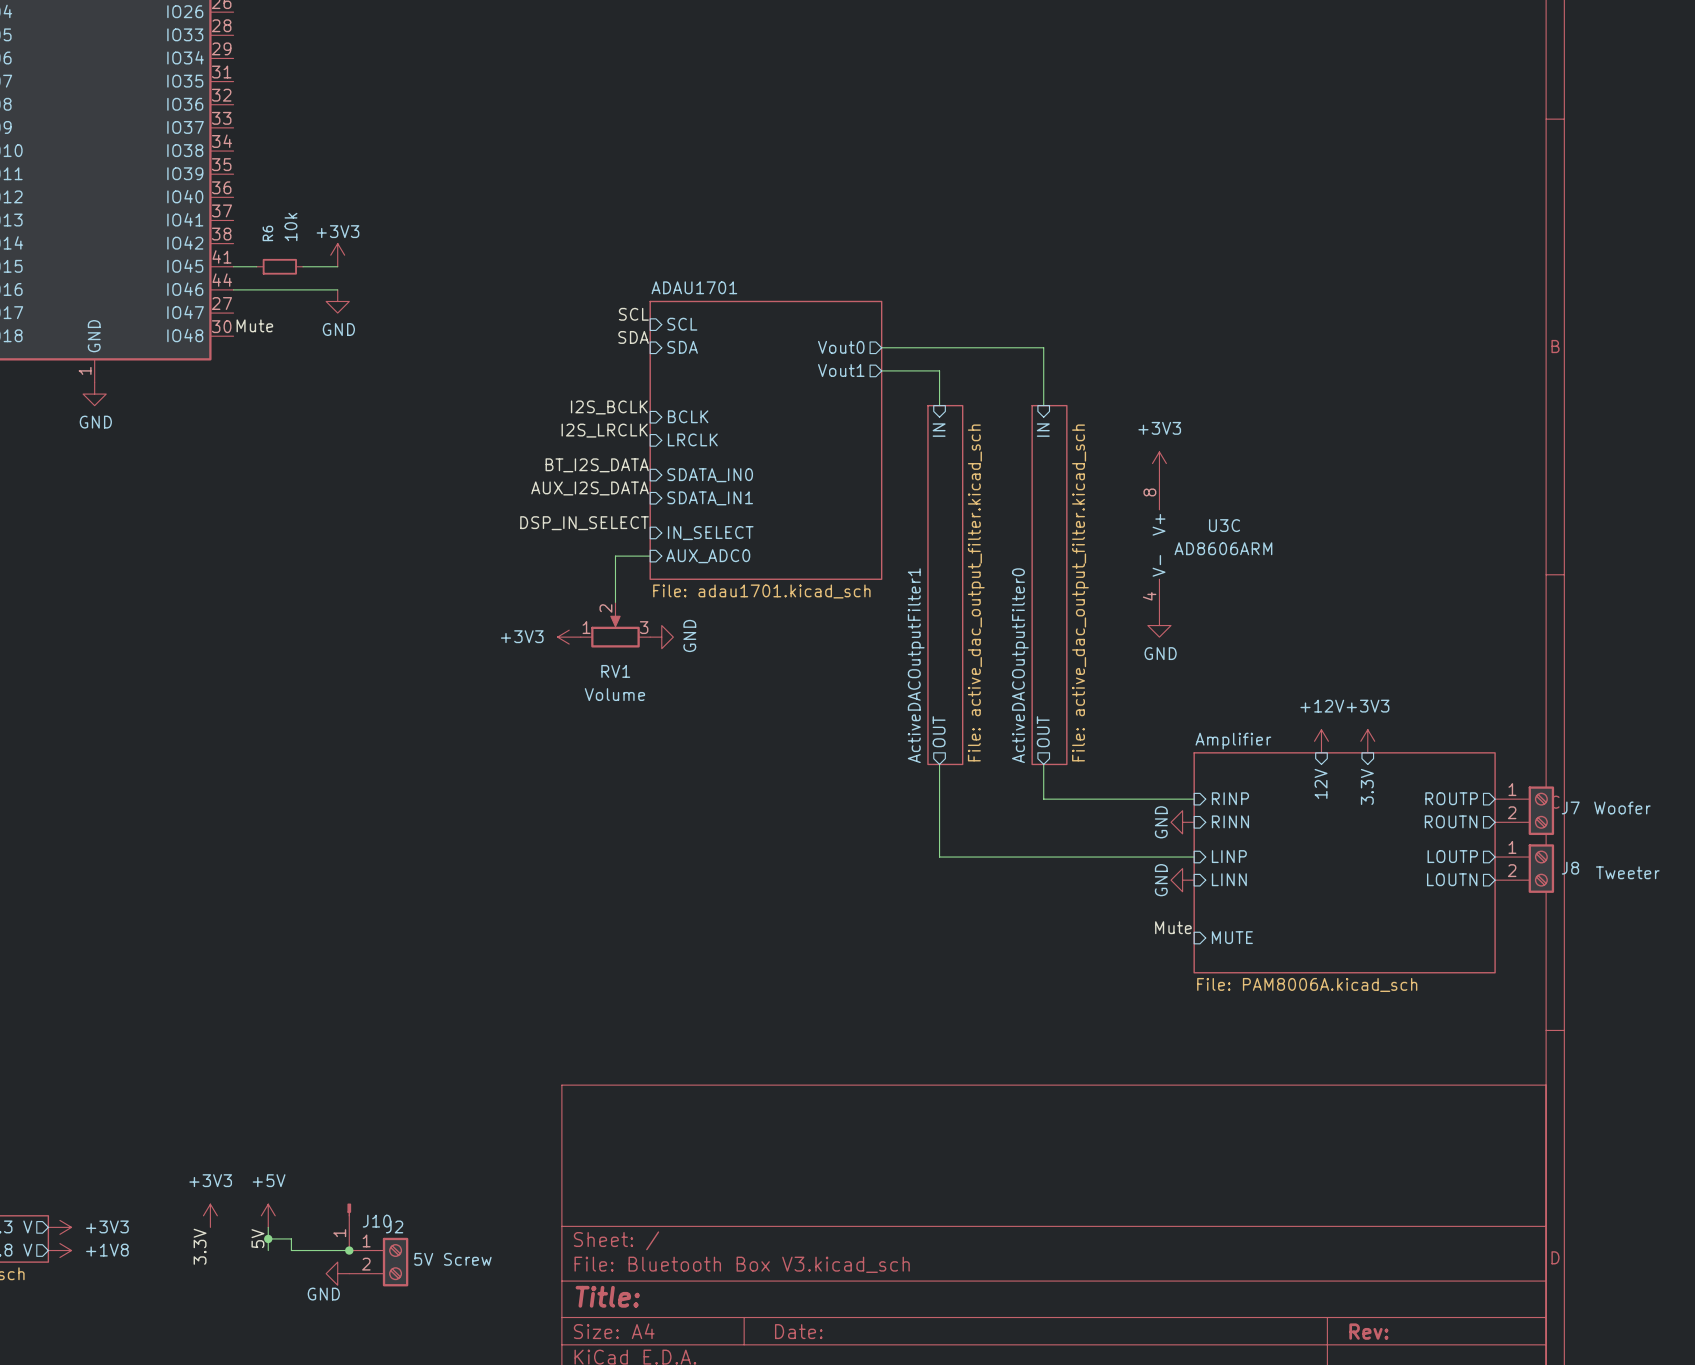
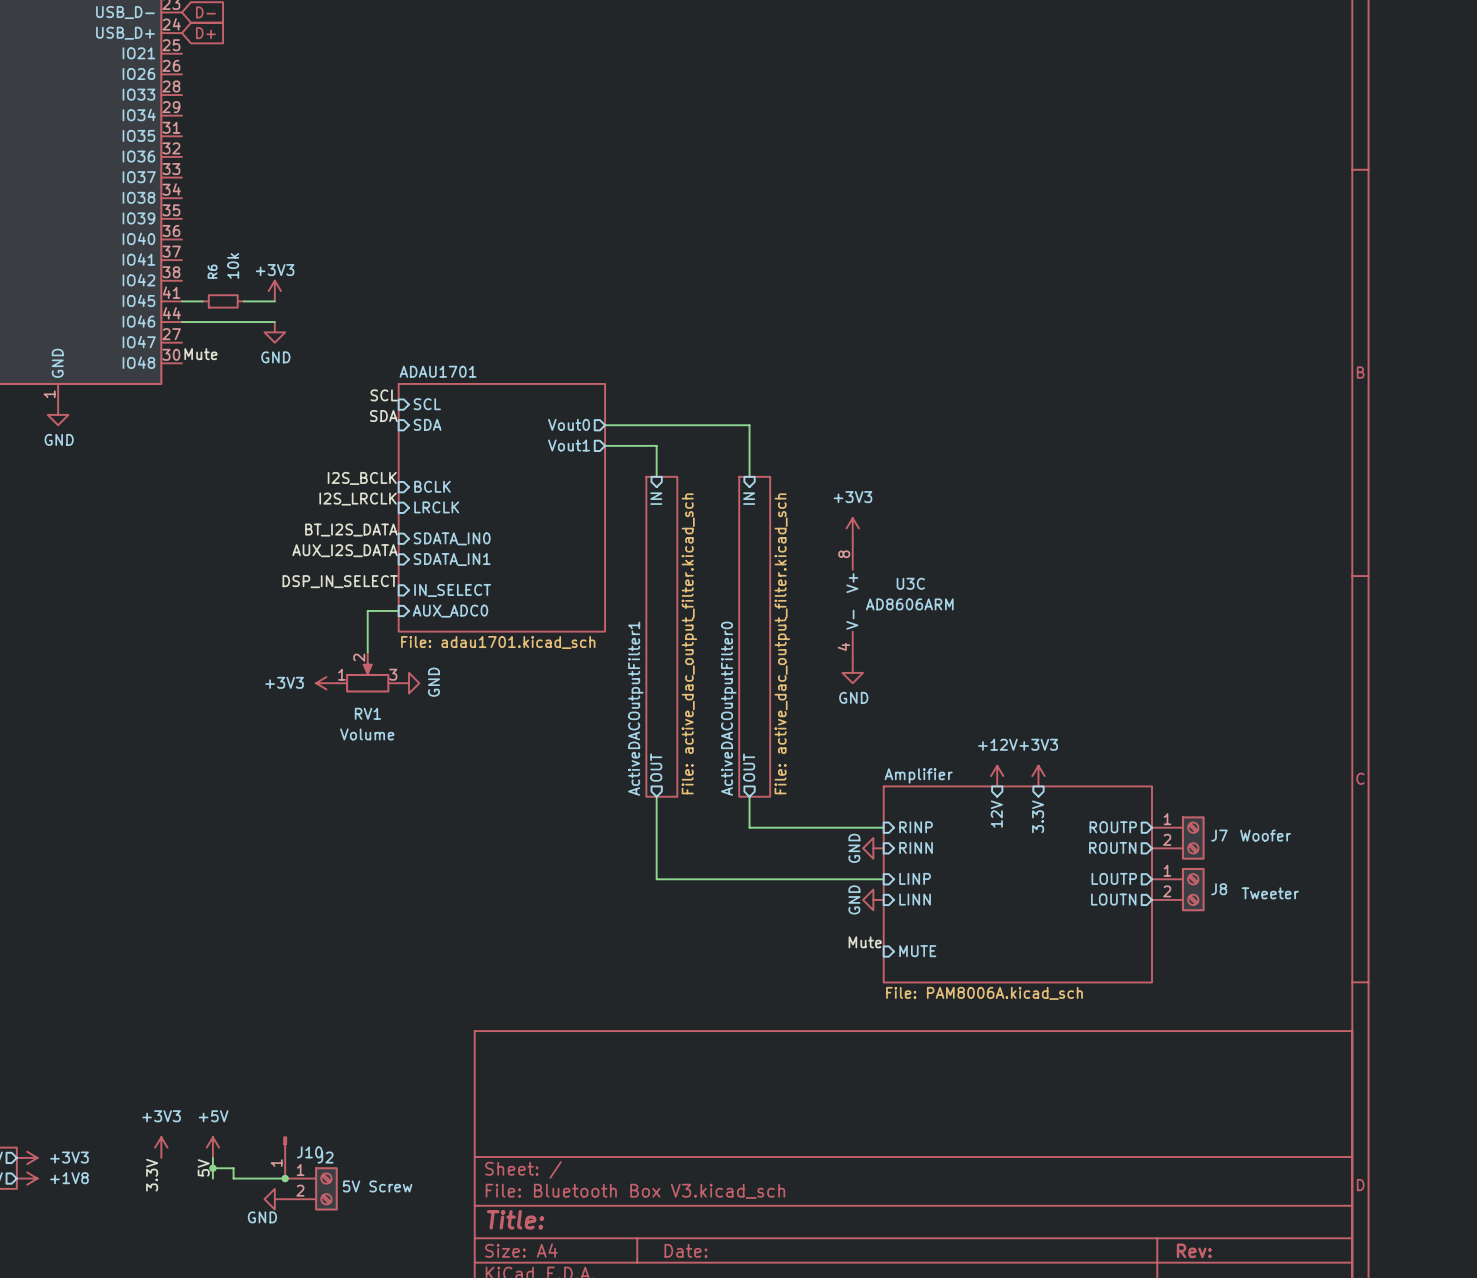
label position: SCL (633, 314) -> SCL (384, 395)
sheet pin position: SCL (682, 324) -> SCL (427, 404)
label position: SDA (633, 337) -> SDA (383, 416)
sheet pin position: SDA (682, 347) -> SDA (427, 424)
sheet pin position: Vout0 (841, 347) -> Vout0 (569, 424)
wire: (881, 347) (1043, 347) (1043, 405) -> (605, 425) (749, 425) (749, 476)
sheet pin position: Vout1 (841, 370) -> Vout1 (569, 445)
wire: (881, 370) (939, 370) (939, 405) -> (605, 445) (656, 445) (656, 476)
label position: I2S_BCLK (609, 407) -> I2S_BCLK (362, 478)
sheet pin position: BCLK (688, 416) -> BCLK (432, 486)
label position: I2S_LRCLK (604, 430) -> I2S_LRCLK (358, 499)
sheet pin position: IN (939, 430) -> IN (749, 498)
sheet pin: IN (1043, 430) -> none
sheet pin position: LRCLK (692, 439) -> LRCLK (436, 507)
sheet ADAU1701 position: (765, 440) -> (501, 507)
power symbol: +3V3 (1159, 463) -> none
label position: BT_I2S_DATA (597, 465) -> BT_I2S_DATA (351, 530)
sheet pin position: SDATA_IN0 (710, 475) -> SDATA_IN0 (452, 538)
sheet pin: none -> IN (656, 498)
label position: AUX_I2S_DATA (590, 488) -> AUX_I2S_DATA (345, 550)
sheet pin position: SDATA_IN1 (710, 498) -> SDATA_IN1 (452, 559)
power symbol: none -> +3V3 (852, 528)
label position: DSP_IN_SELECT (584, 523) -> DSP_IN_SELECT (340, 581)
sheet pin position: IN_SELECT (710, 533) -> IN_SELECT (452, 590)
U3C position: (1159, 544) -> (852, 600)
wire: (650, 556) (615, 556) (615, 602) -> (398, 610) (367, 610) (367, 652)
sheet pin position: AUX_ADC0 (708, 556) -> AUX_ADC0 (450, 611)
sheet ActiveDACOutputFilter1 position: (945, 585) -> (661, 636)
sheet ActiveDACOutputFilter0 position: (1049, 585) -> (754, 636)
RV1 position: (615, 624) -> (367, 672)
power symbol: GND (1159, 625) -> none
power symbol position: +3V3 (569, 637) -> +3V3 (326, 683)
power symbol: GND (661, 637) -> none
power symbol: none -> GND (852, 672)
power symbol: none -> GND (408, 683)
sheet pin position: OUT (939, 731) -> OUT (749, 767)
sheet pin: OUT (1043, 731) -> none
power symbol position: +12V (1321, 741) -> +12V (997, 776)
power symbol: +3V3 (1367, 741) -> none
wire: (939, 764) (939, 857) -> (749, 796) (749, 827) (811, 827)
wire: (1043, 764) (1043, 799) (1194, 799) -> none
sheet pin position: 12V (1321, 783) -> 12V (996, 814)
sheet pin position: 3.3V (1367, 786) -> 3.3V (1038, 816)
sheet pin: none -> OUT (656, 767)
sheet pin position: RINP (1230, 798) -> RINP (916, 827)
sheet pin position: ROUTP (1451, 798) -> ROUTP (1113, 827)
power symbol: none -> +3V3 (1038, 776)
J7 position: (1524, 810) -> (1178, 838)
sheet pin position: RINN (1230, 821) -> RINN (916, 847)
sheet pin position: ROUTN (1451, 821) -> ROUTN (1112, 847)
wire: none -> (656, 796) (656, 879) (883, 879)
power symbol: GND (1182, 822) -> none
sheet pin position: LINP (1229, 856) -> LINP (915, 878)
sheet pin position: LOUTP (1452, 856) -> LOUTP (1114, 878)
wire: (1020, 857) (1194, 857) -> none
sheet Amplifier position: (1344, 862) -> (1017, 884)
J8 position: (1524, 868) -> (1178, 889)
sheet pin position: LINN (1229, 879) -> LINN (915, 899)
sheet pin position: LOUTN (1452, 879) -> LOUTN (1113, 899)
power symbol: none -> GND (873, 848)
power symbol: GND (1182, 880) -> none
label position: Mute (1173, 927) -> Mute (865, 942)
sheet pin position: MUTE (1232, 937) -> MUTE (917, 951)
power symbol: none -> GND (873, 899)

